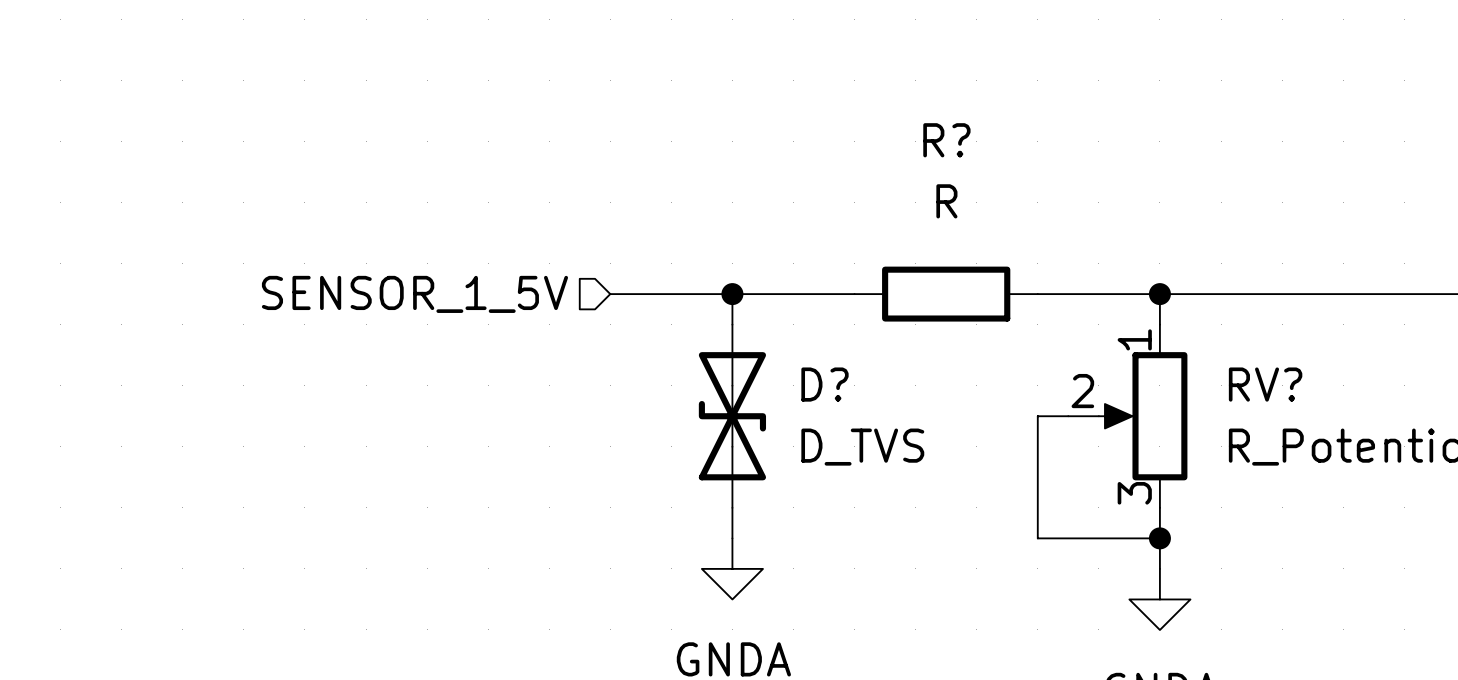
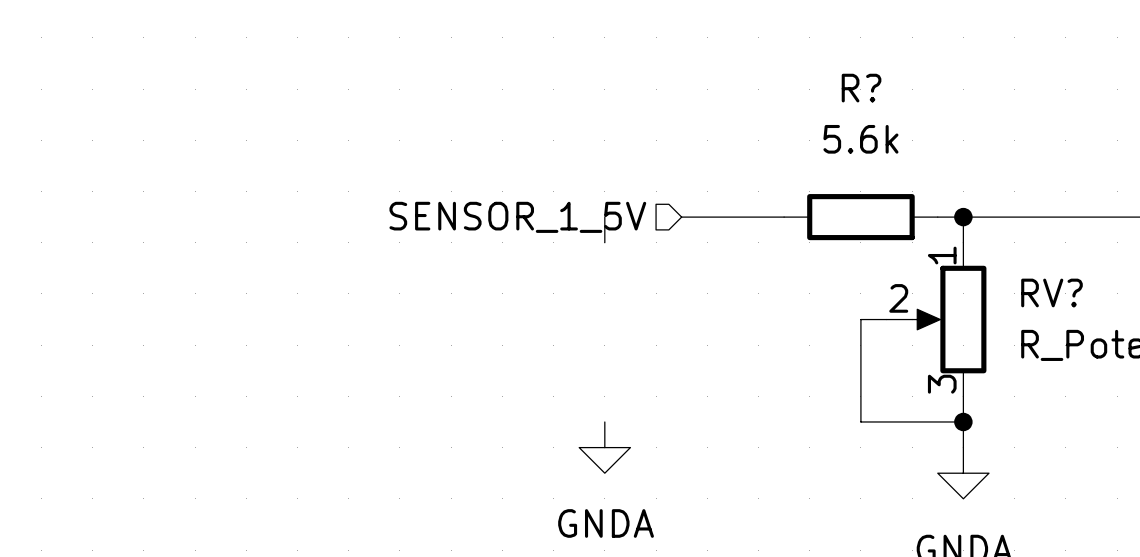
hierarchical label position: SENSOR_1_5V (414, 294) -> SENSOR_1_5V (517, 217)
wire: (610, 294) (824, 294) -> none
junction: (732, 294) -> none
R?: R (946, 294) -> none
wire: (1037, 294) (1129, 294) -> (707, 217) (784, 217)
R?: none -> 5.6k (860, 217)
D?: D_TVS (732, 416) -> none
wire: (732, 507) (732, 538) -> none

